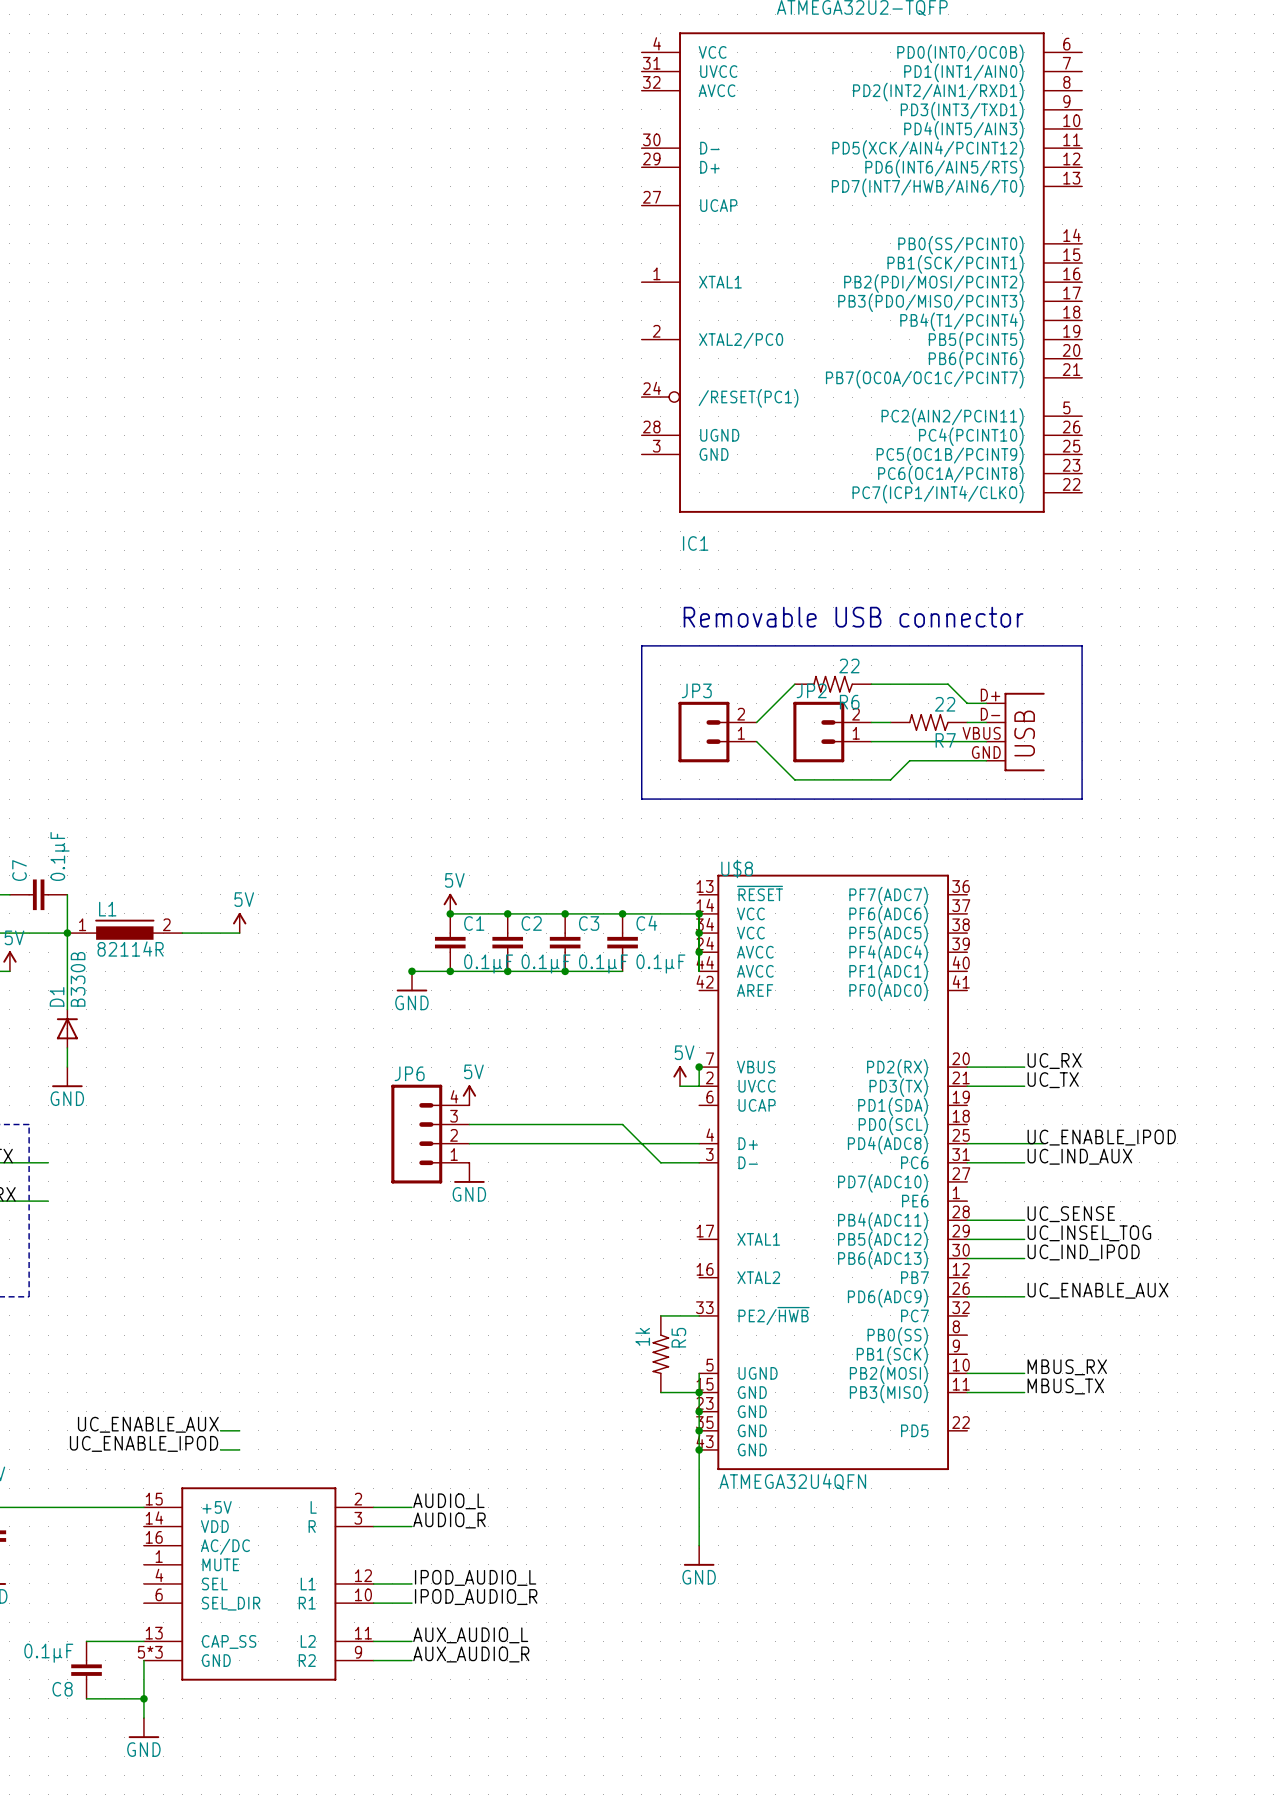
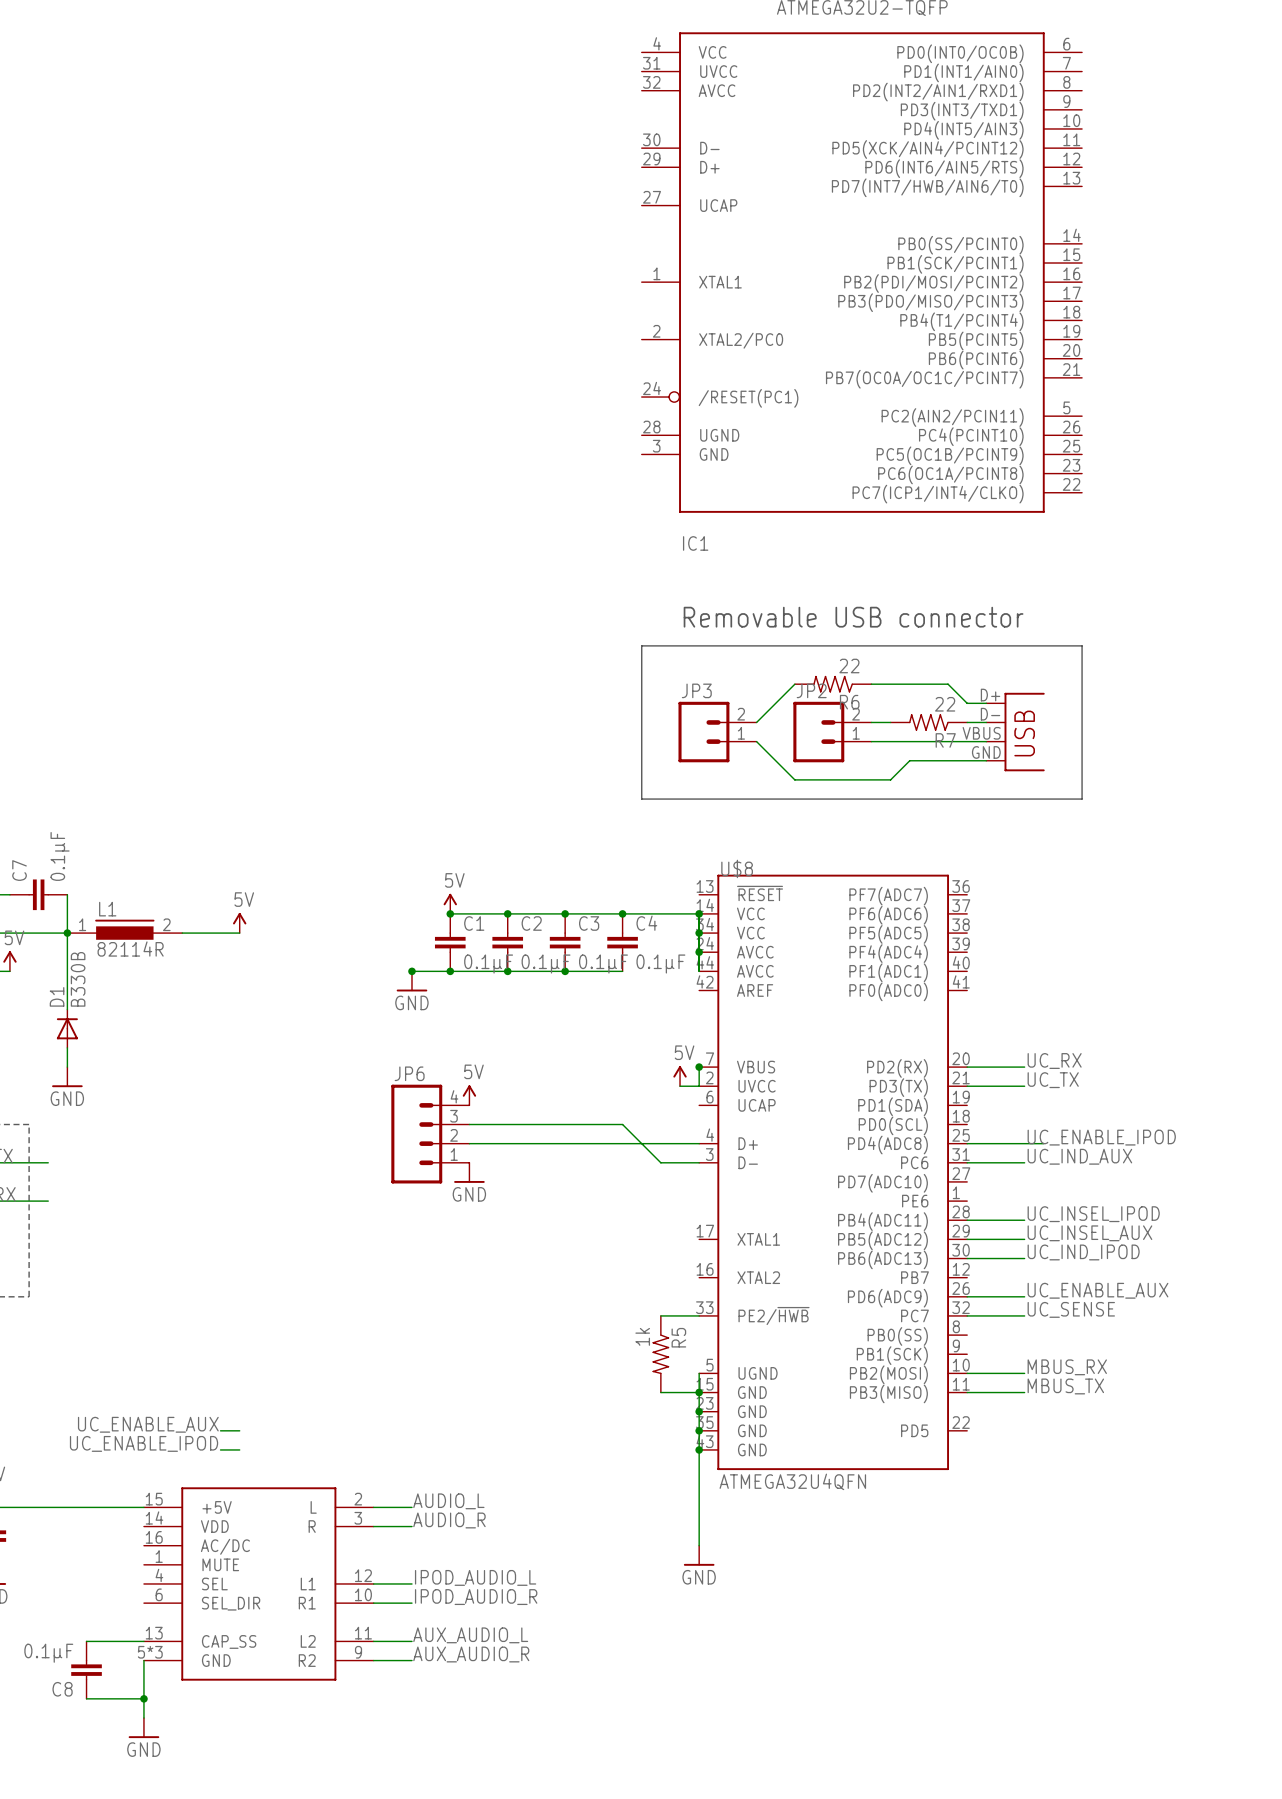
label: UC_SENSE (1071, 1214) -> UC_INSEL_IPOD (1093, 1214)
label: UC_INSEL_TOG (1089, 1233) -> UC_INSEL_AUX (1089, 1233)
label: none -> UC_SENSE (1071, 1309)
wire: none -> (967, 1315) (1024, 1315)

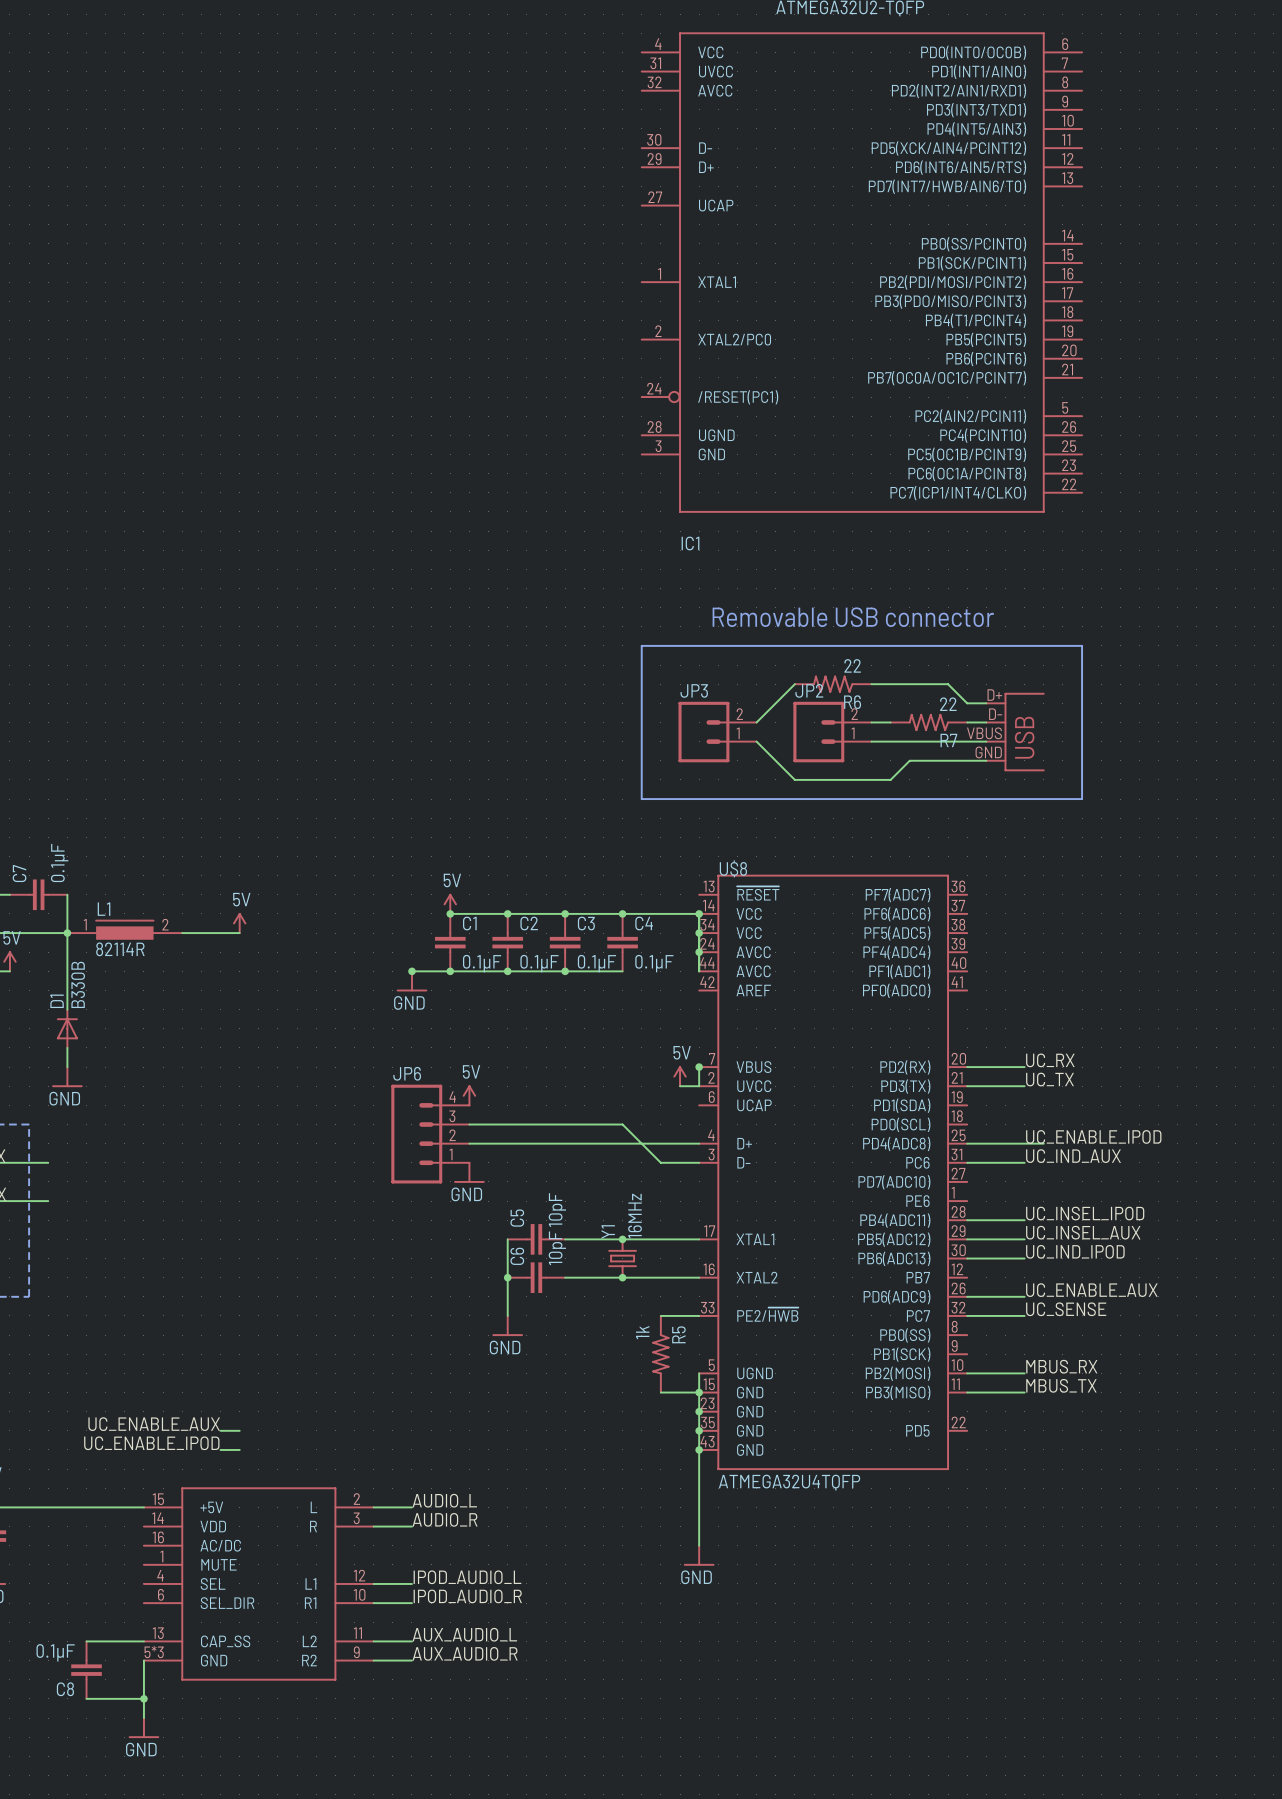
wire: none -> (507, 1239) (507, 1315)
C5: none -> 10pF (536, 1239)
wire: none -> (565, 1239) (699, 1239)
junction: none -> (622, 1239)
Y1: none -> 16MHz (622, 1258)
junction: none -> (507, 1277)
C6: none -> 10pF (536, 1277)
wire: none -> (565, 1277) (699, 1277)
junction: none -> (622, 1277)
power symbol: none -> GND (507, 1326)
U$8 value: ATMEGA32U4QFN (792, 1481) -> ATMEGA32U4TQFP (789, 1482)

